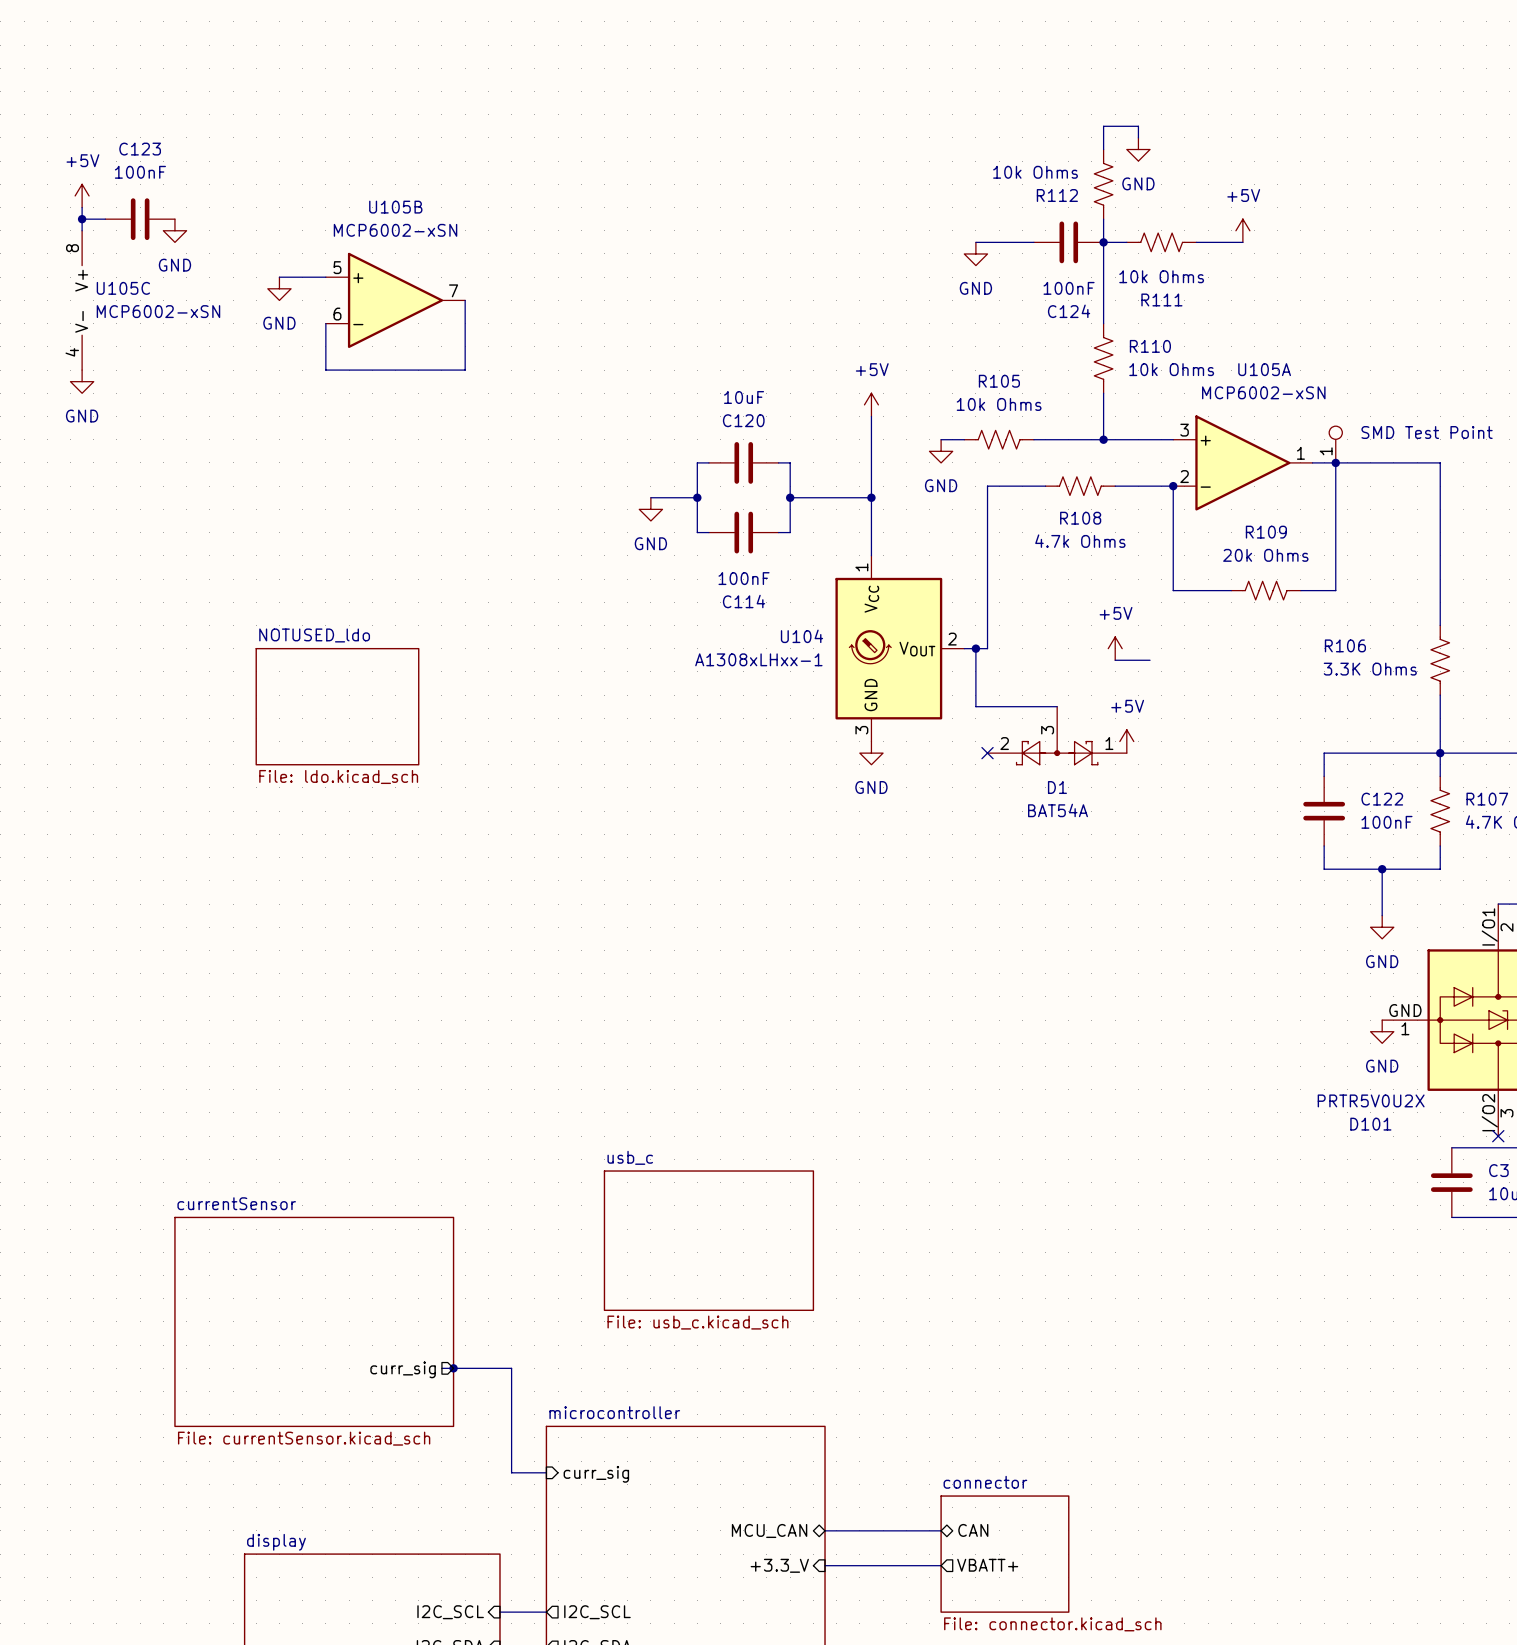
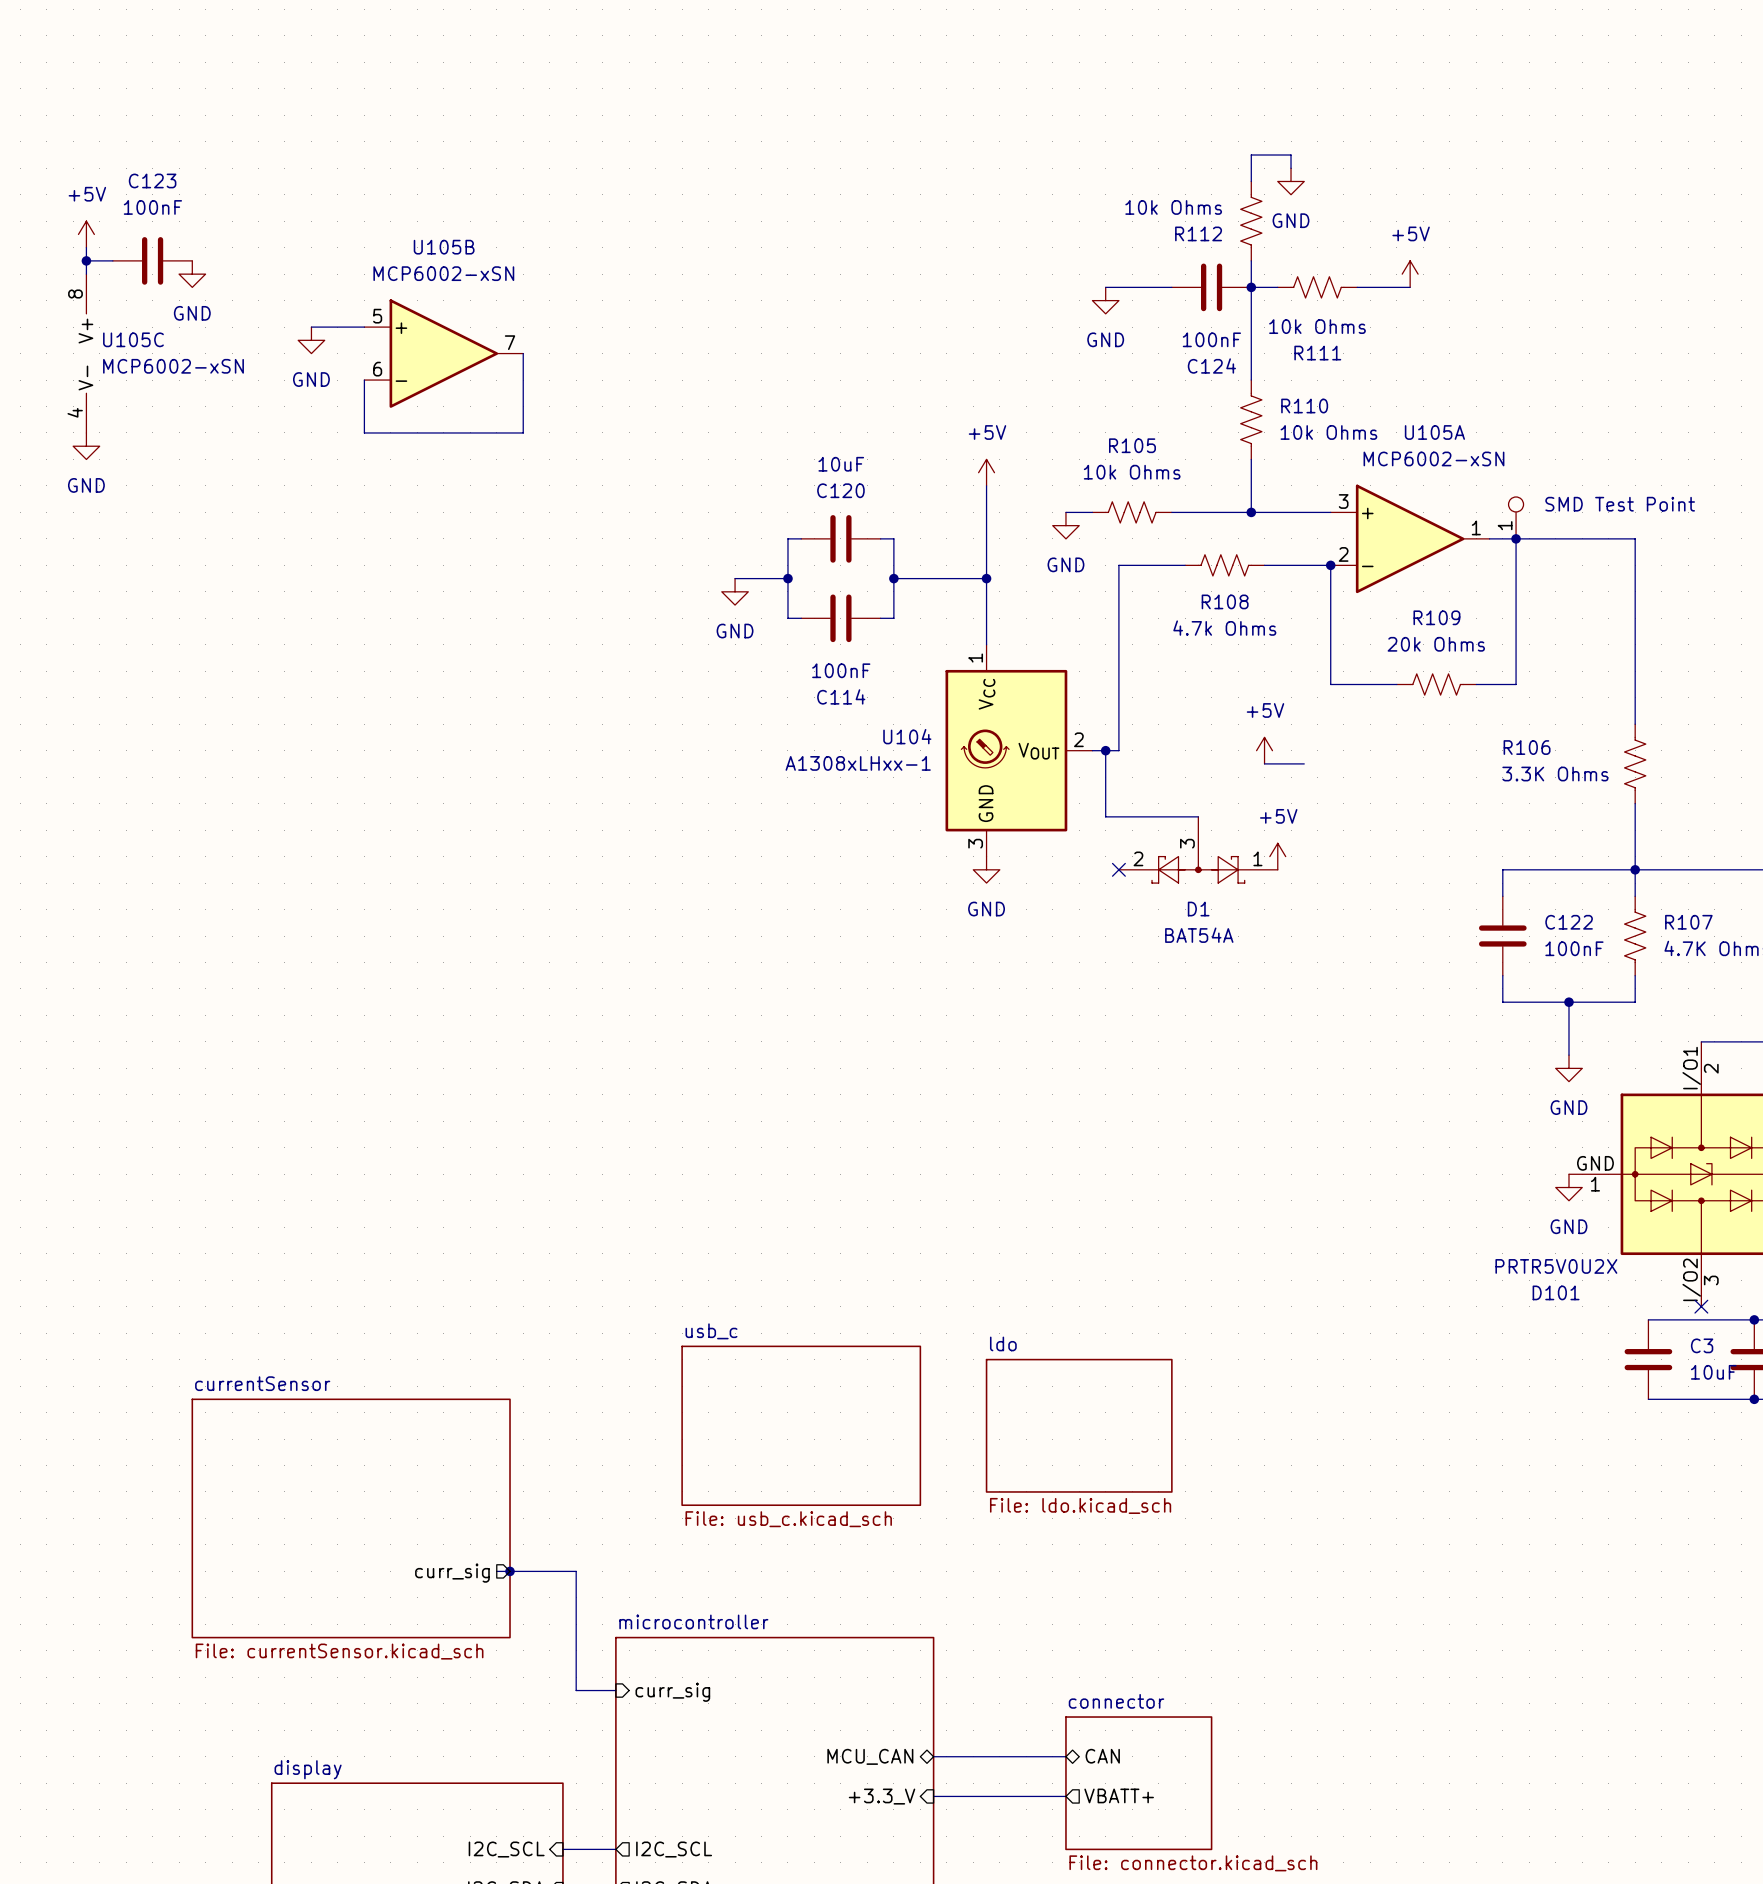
sheet NOTUSED_ldo: File: ldo.kicad_sch (337, 706) -> none
sheet ldo: none -> File: ldo.kicad_sch (1079, 1425)

